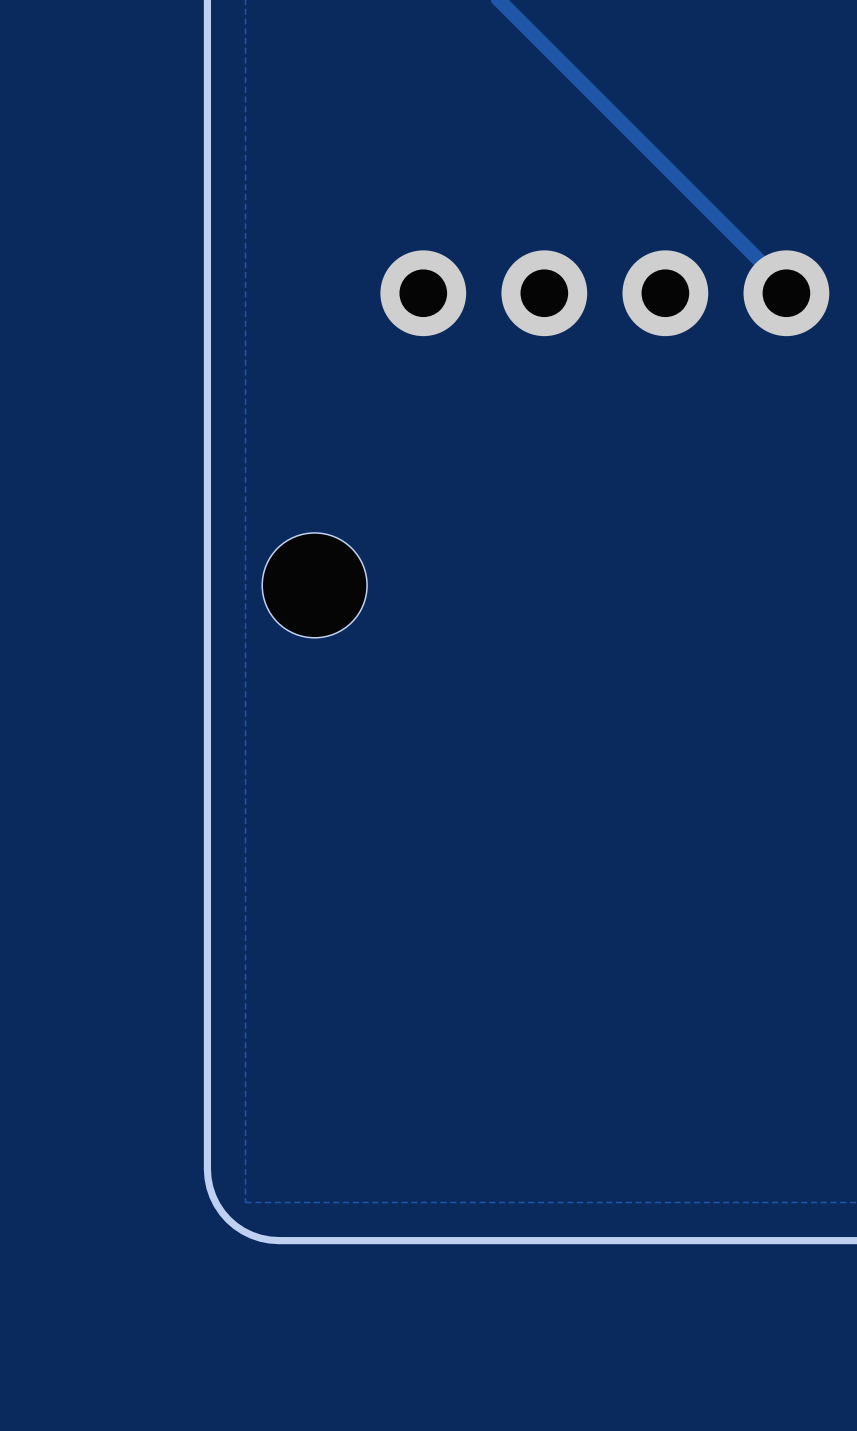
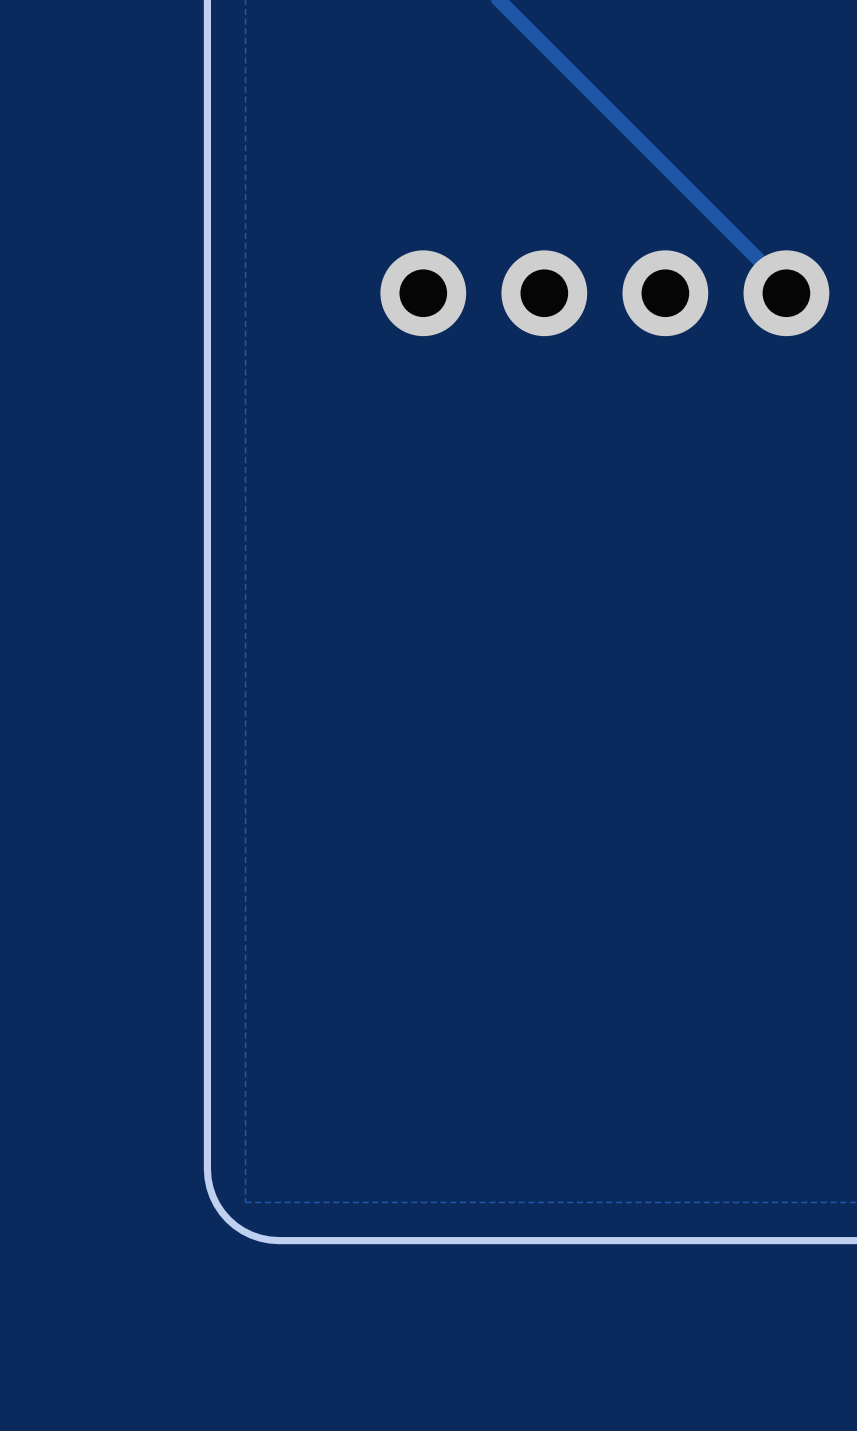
part: (314, 585) -> none

